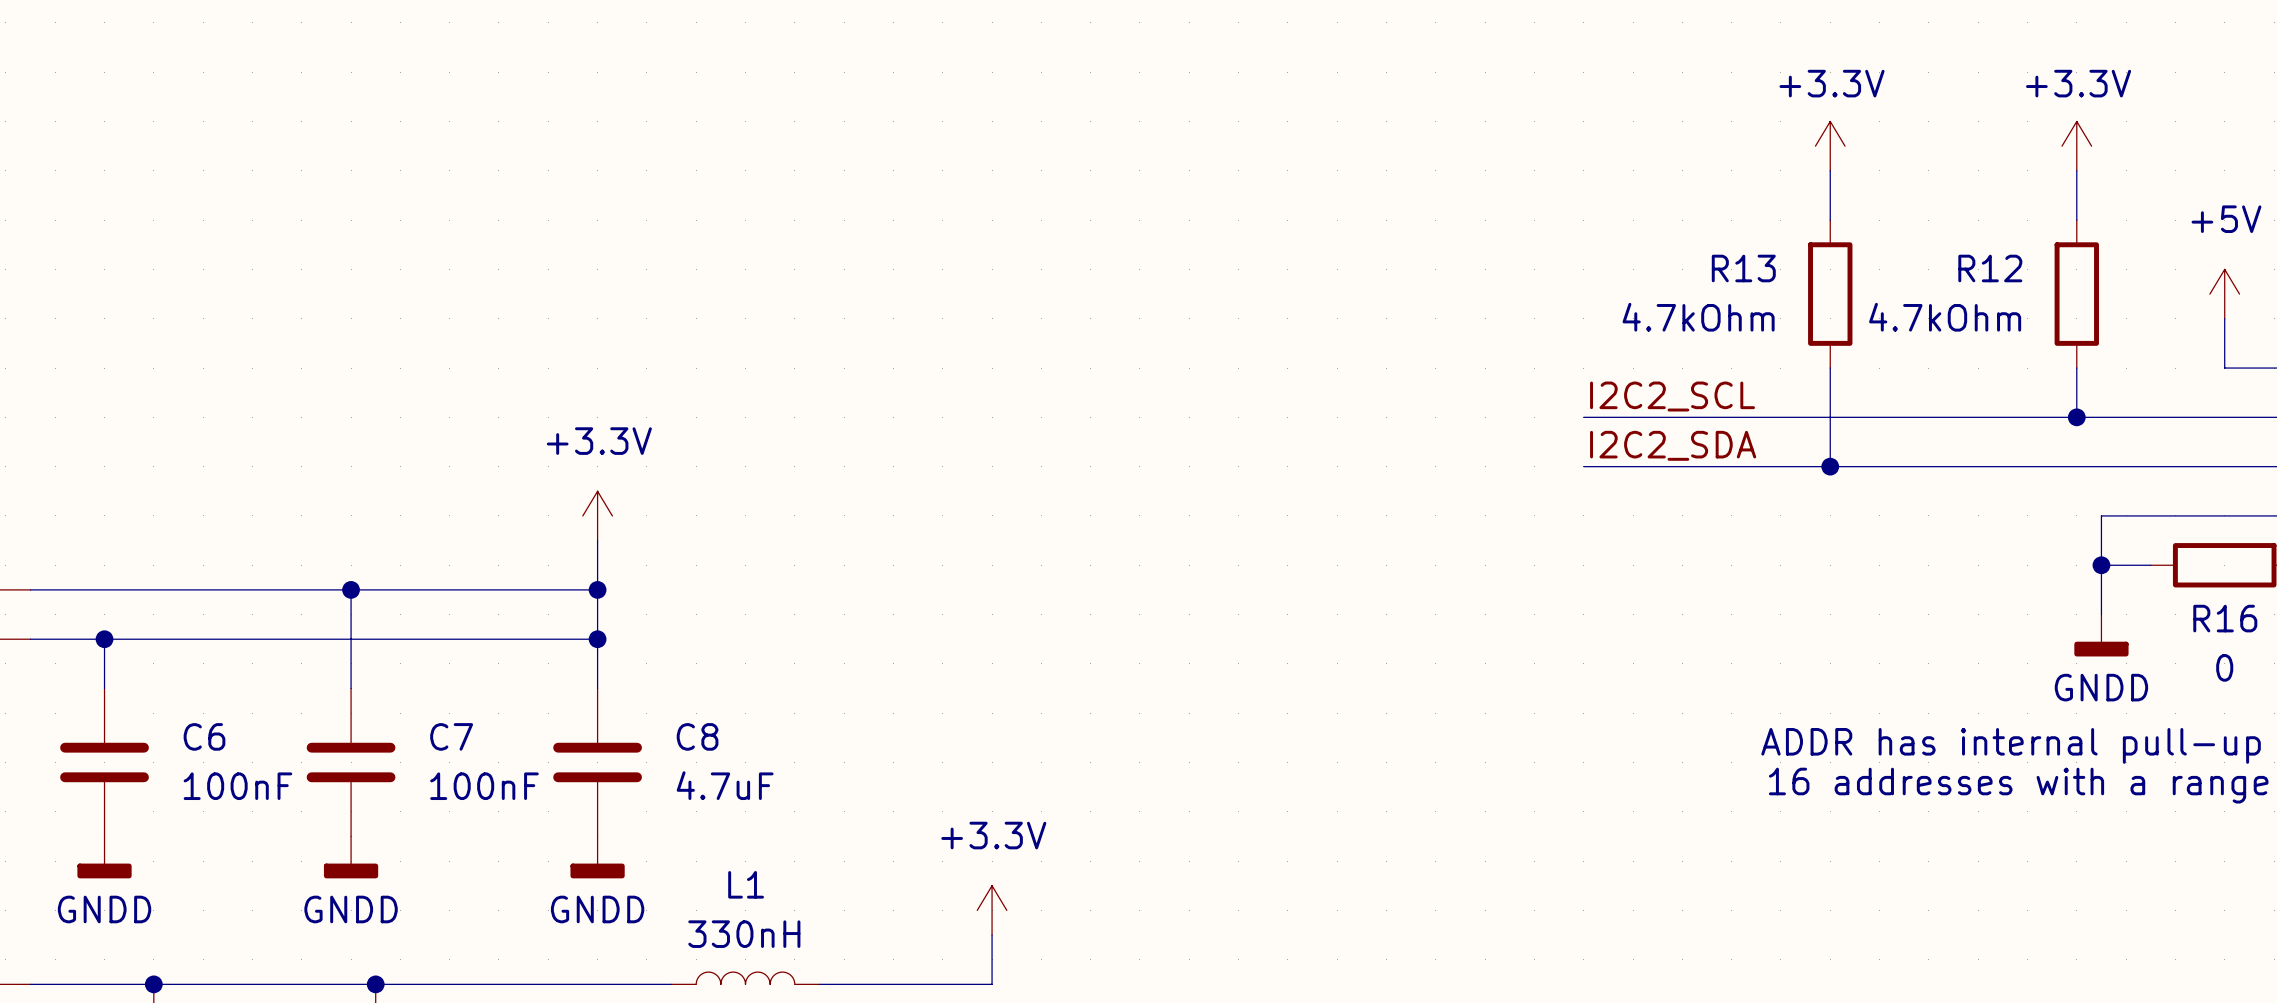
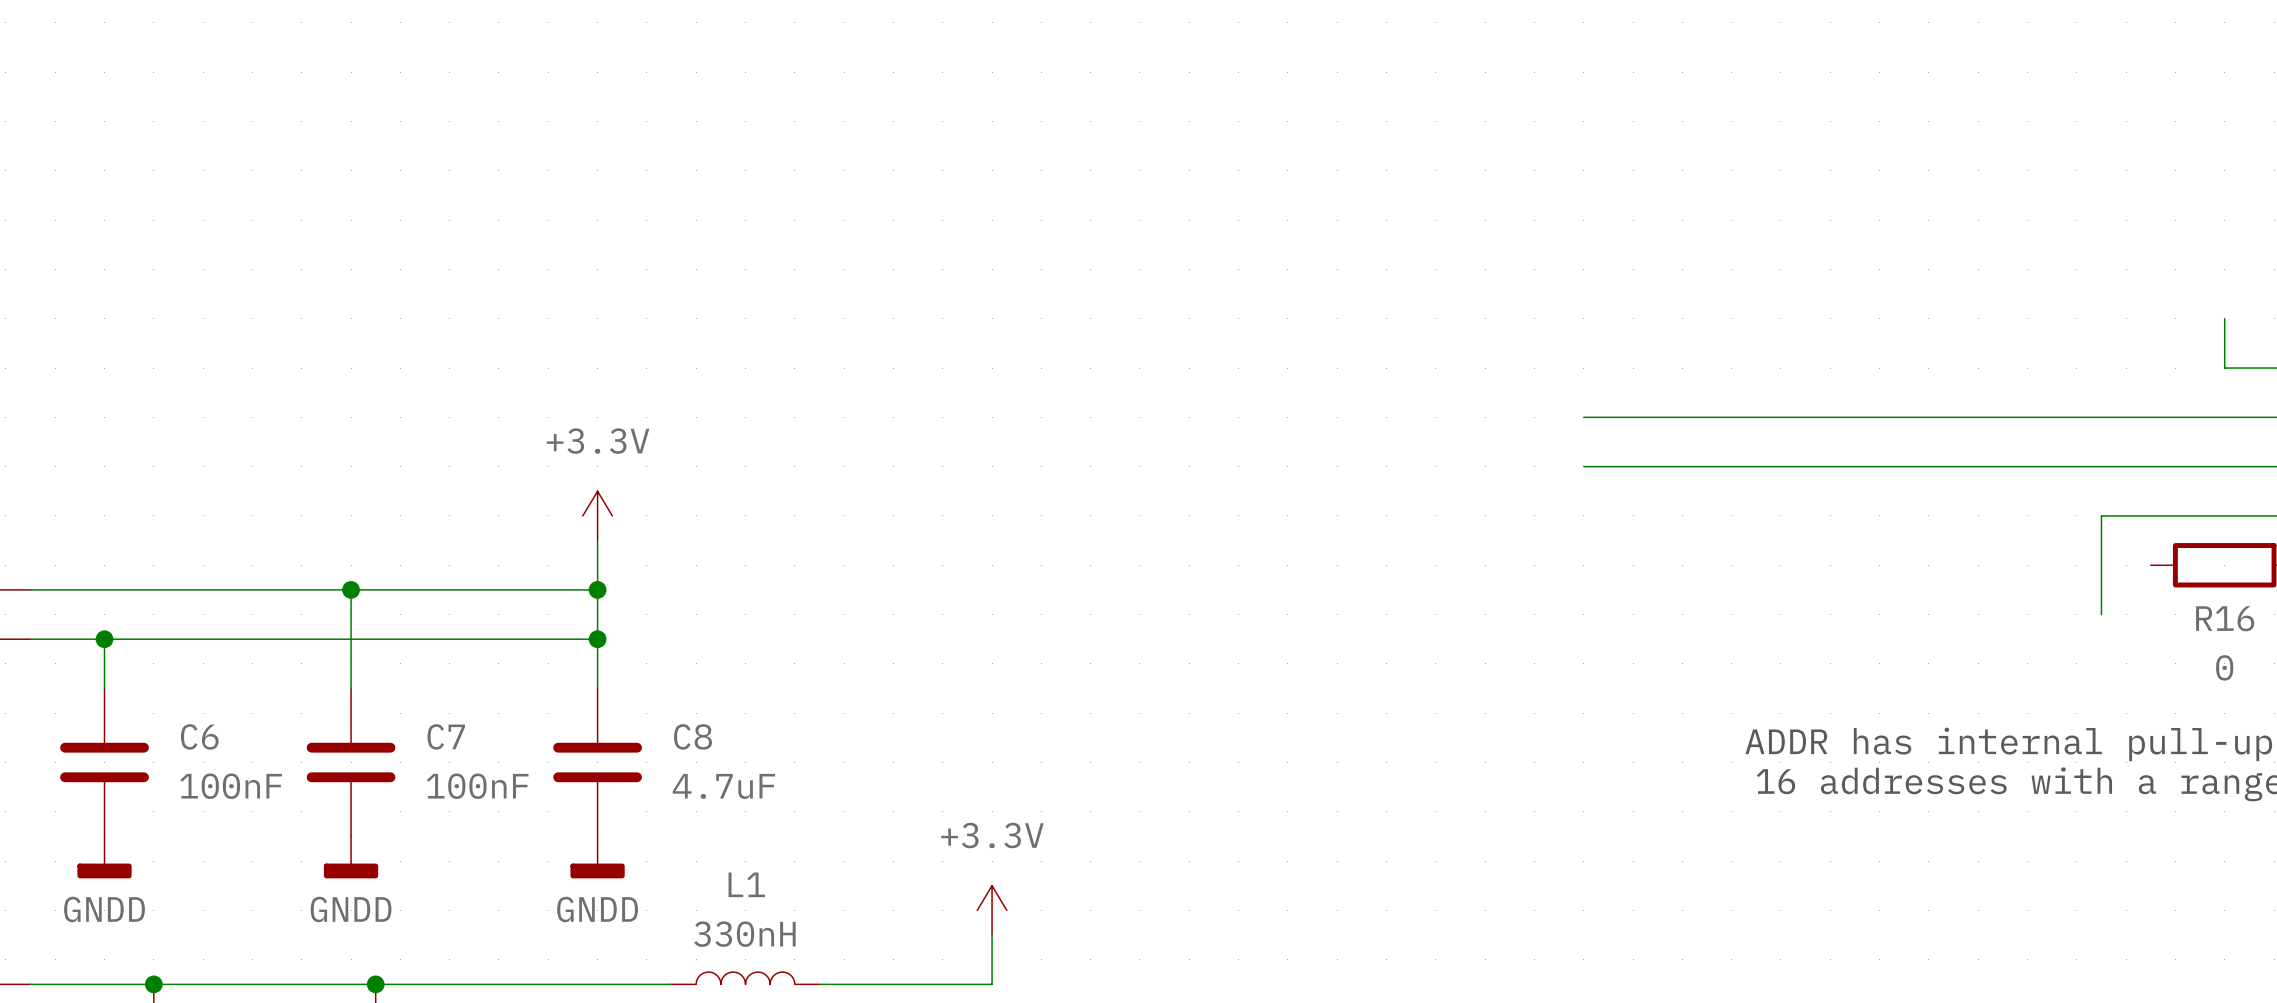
power symbol: +3.3V (1830, 146) -> none
power symbol: +3.3V (2076, 146) -> none
wire: (1830, 170) (1830, 220) -> none
wire: (2076, 170) (2076, 220) -> none
R13: 4.7kOhm (1830, 294) -> none
R12: 4.7kOhm (2076, 294) -> none
power symbol: +5V (2224, 294) -> none
wire: (1830, 368) (1830, 466) -> none
wire: (2076, 368) (2076, 417) -> none
label: I2C2_SCL (1672, 396) -> none
junction: (2076, 417) -> none
label: I2C2_SDA (1673, 445) -> none
junction: (1830, 466) -> none
wire: (2101, 565) (2150, 565) -> none
junction: (2101, 565) -> none
power symbol: GNDD (2101, 635) -> none

